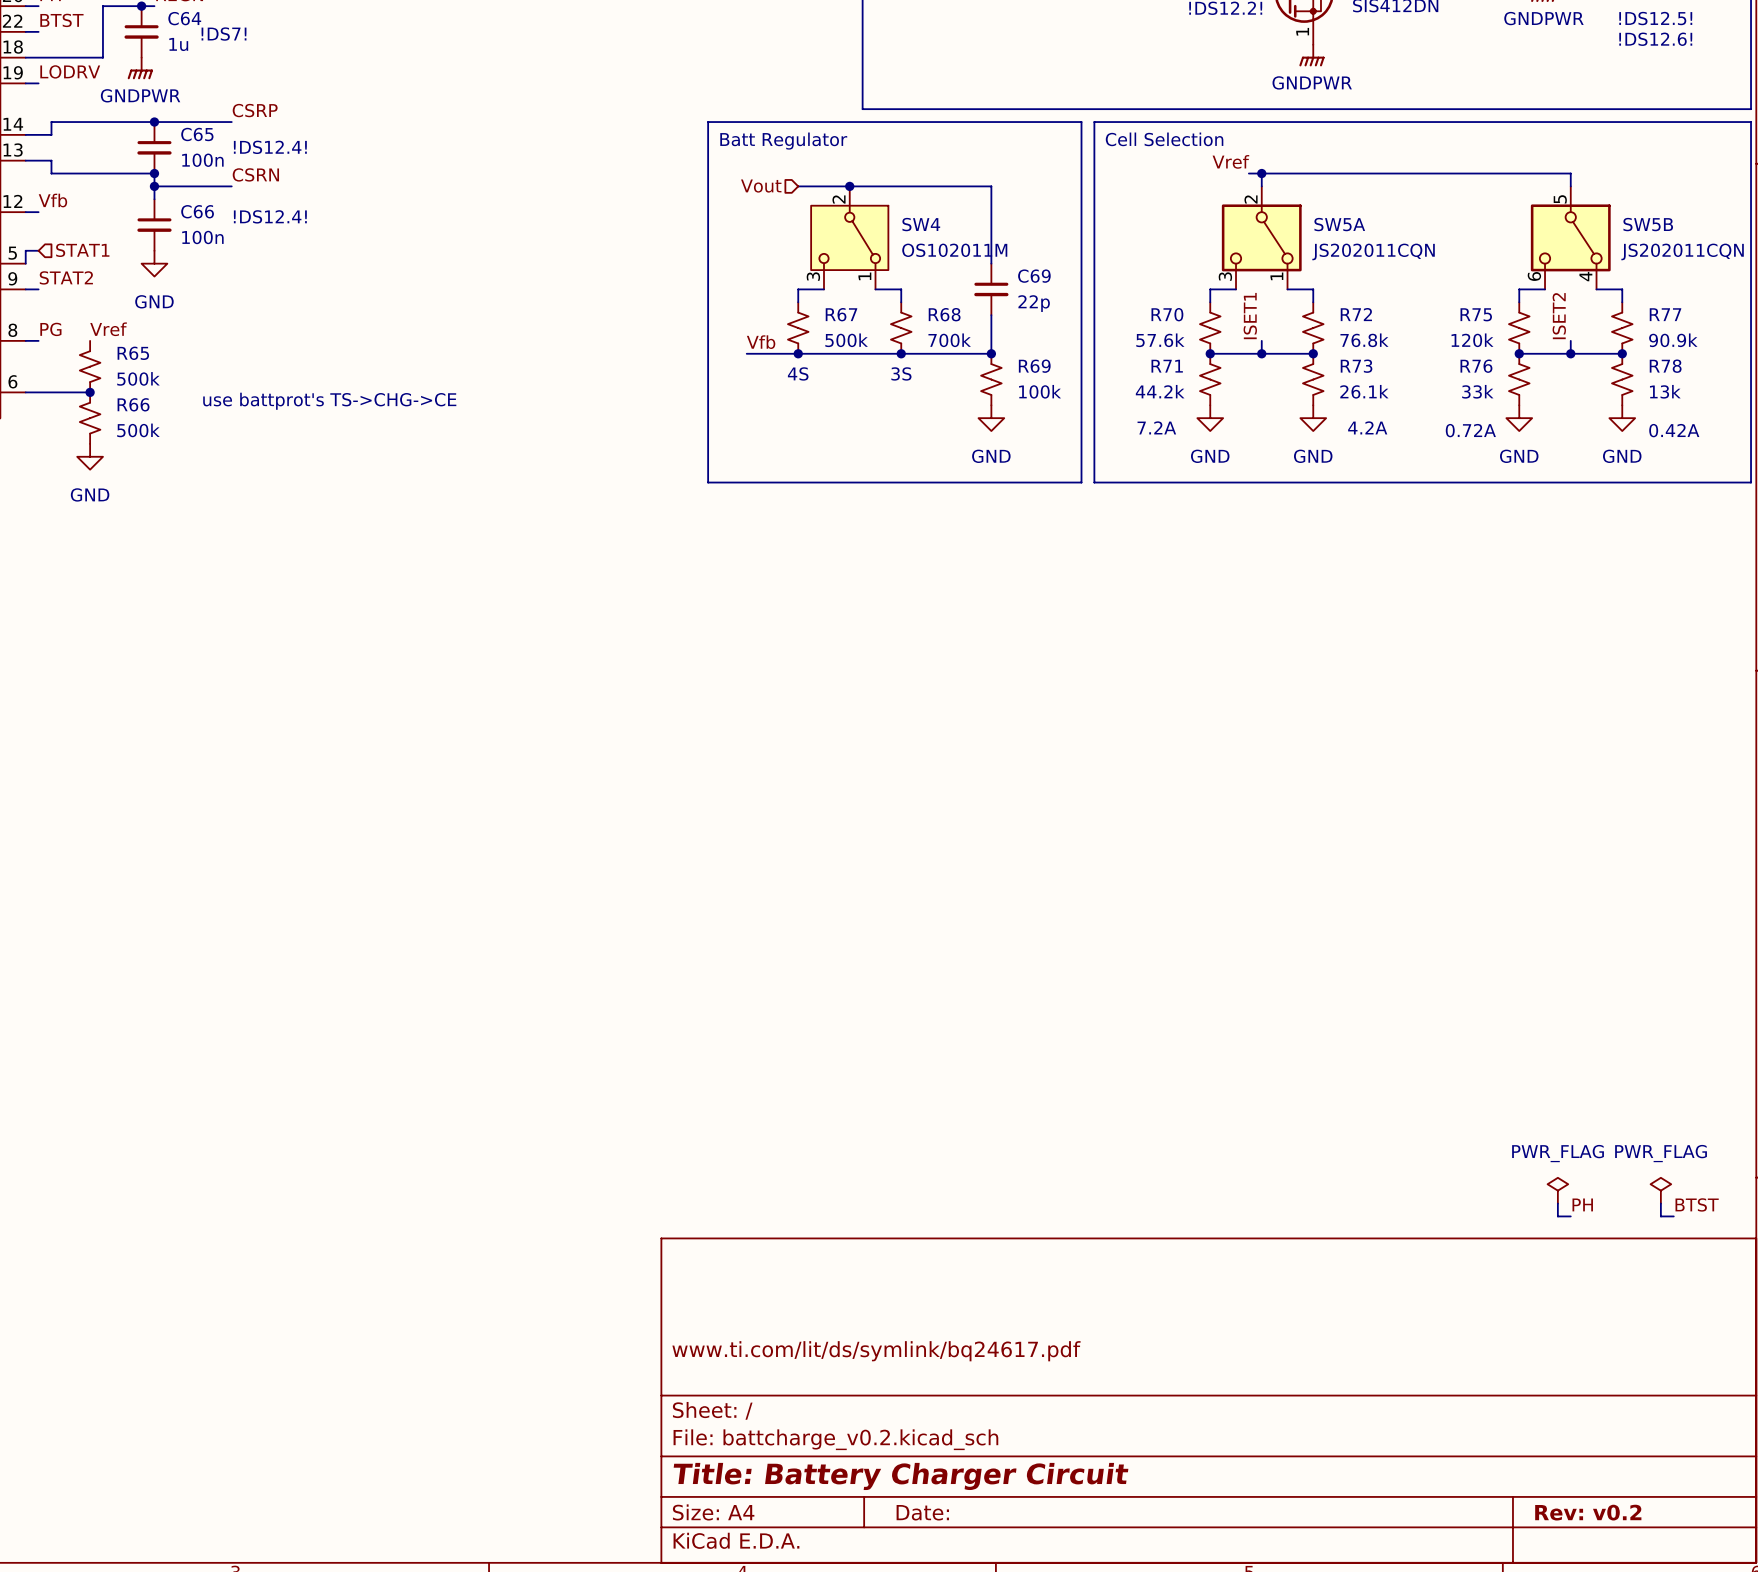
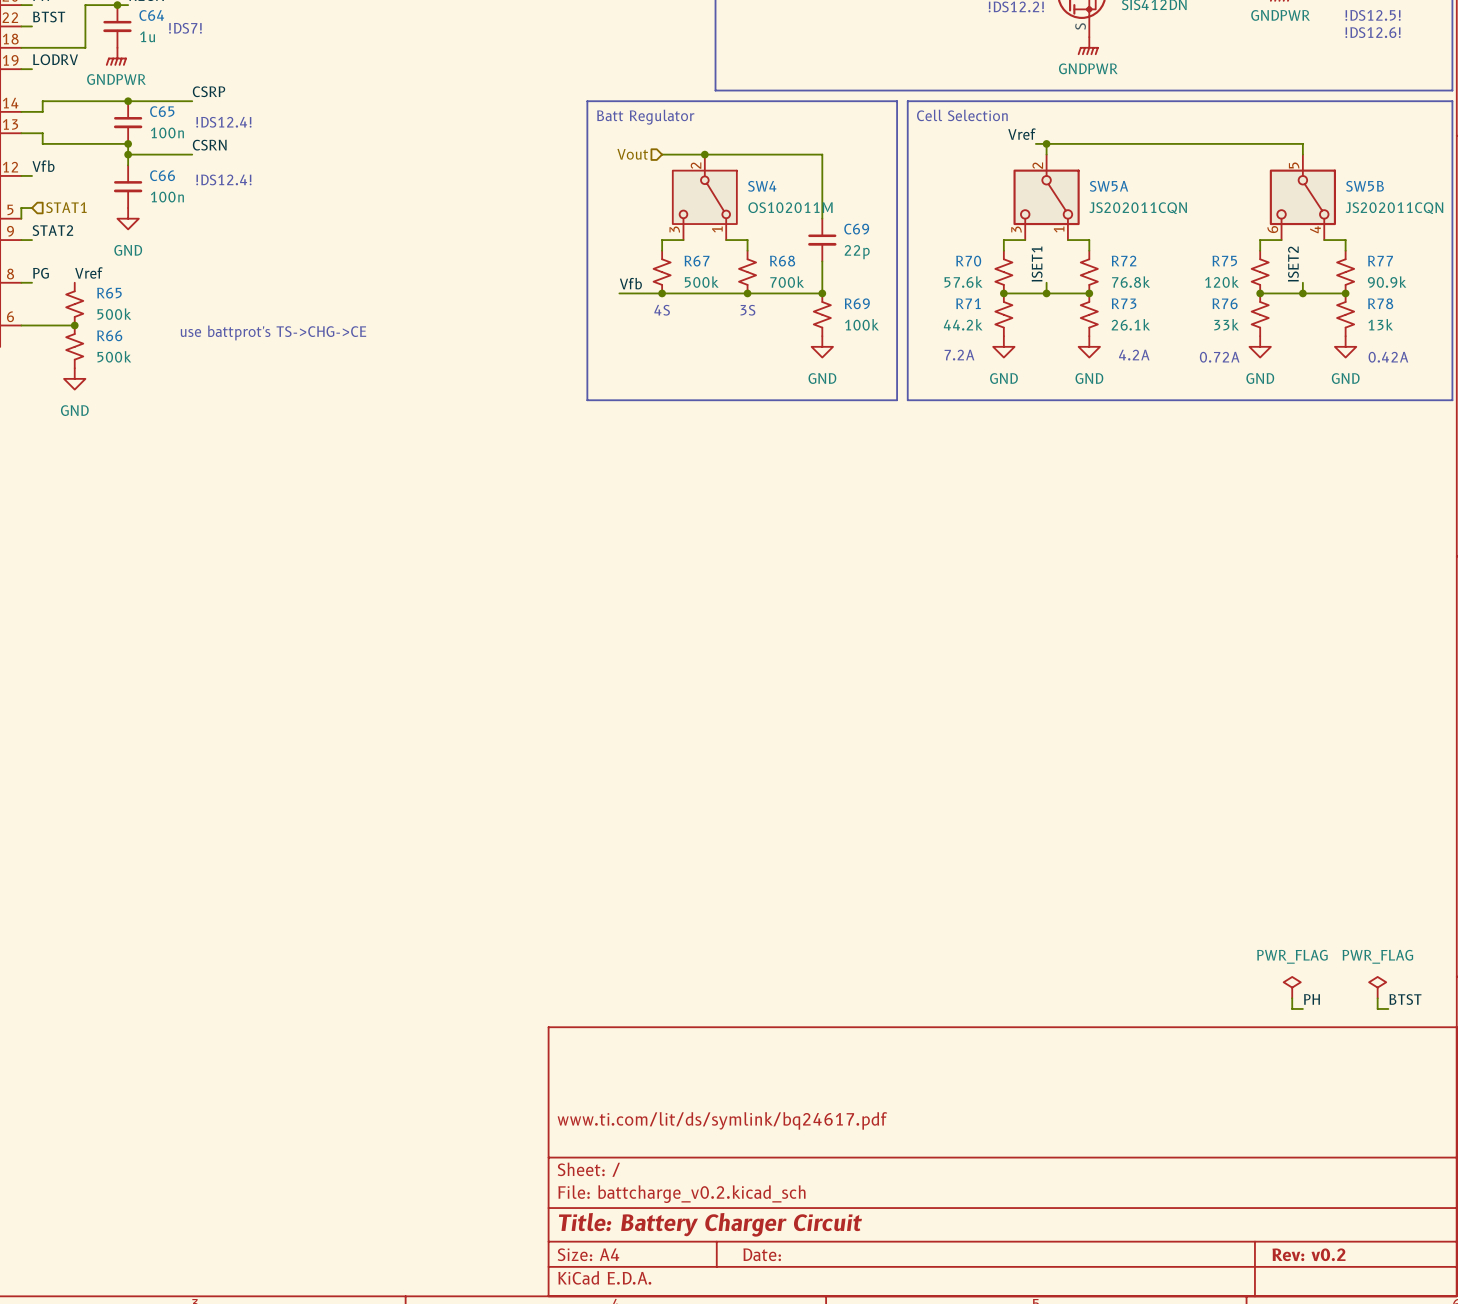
part pin name: none -> S (1080, 26)
part pin number: 1 (1302, 31) -> none

